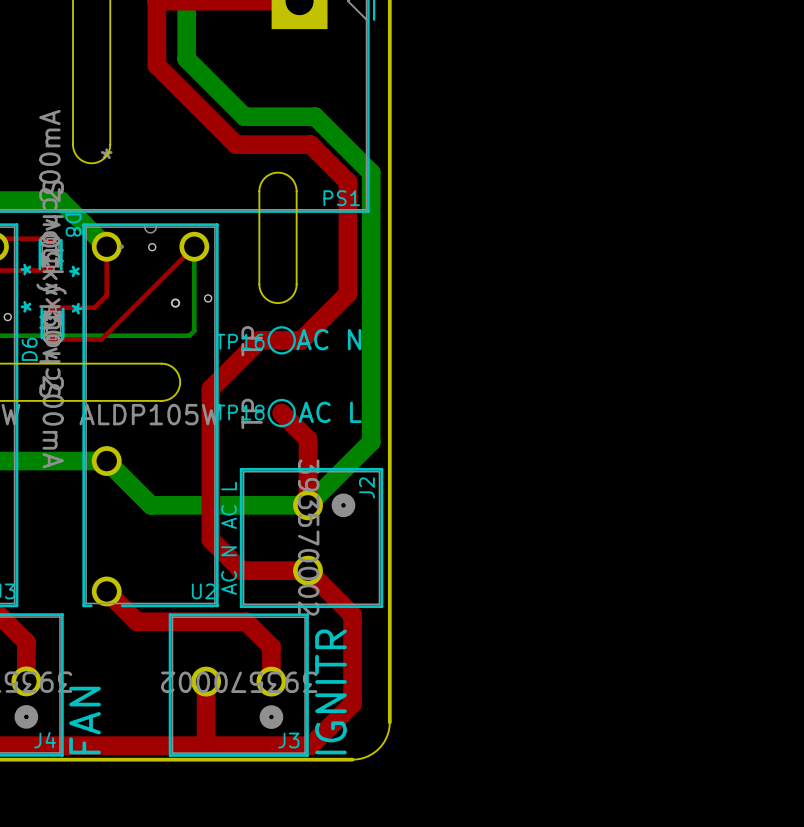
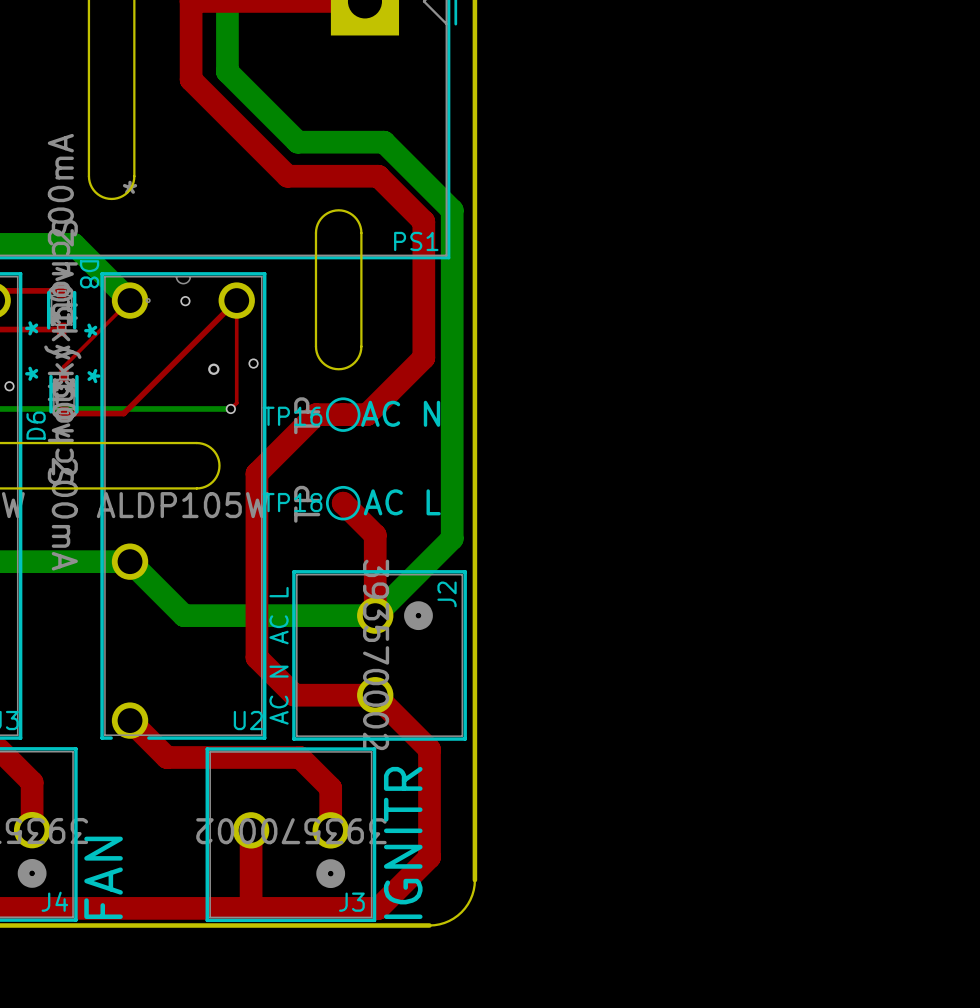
top track: (106, 246) (106, 295) (94, 307) (52, 307) -> (130, 300) (63, 366) (63, 374)
top track: none -> (236, 300) (236, 403) (230, 408)
bottom track: (194, 246) (194, 330) (189, 335) -> none
via: none -> (230, 408)

